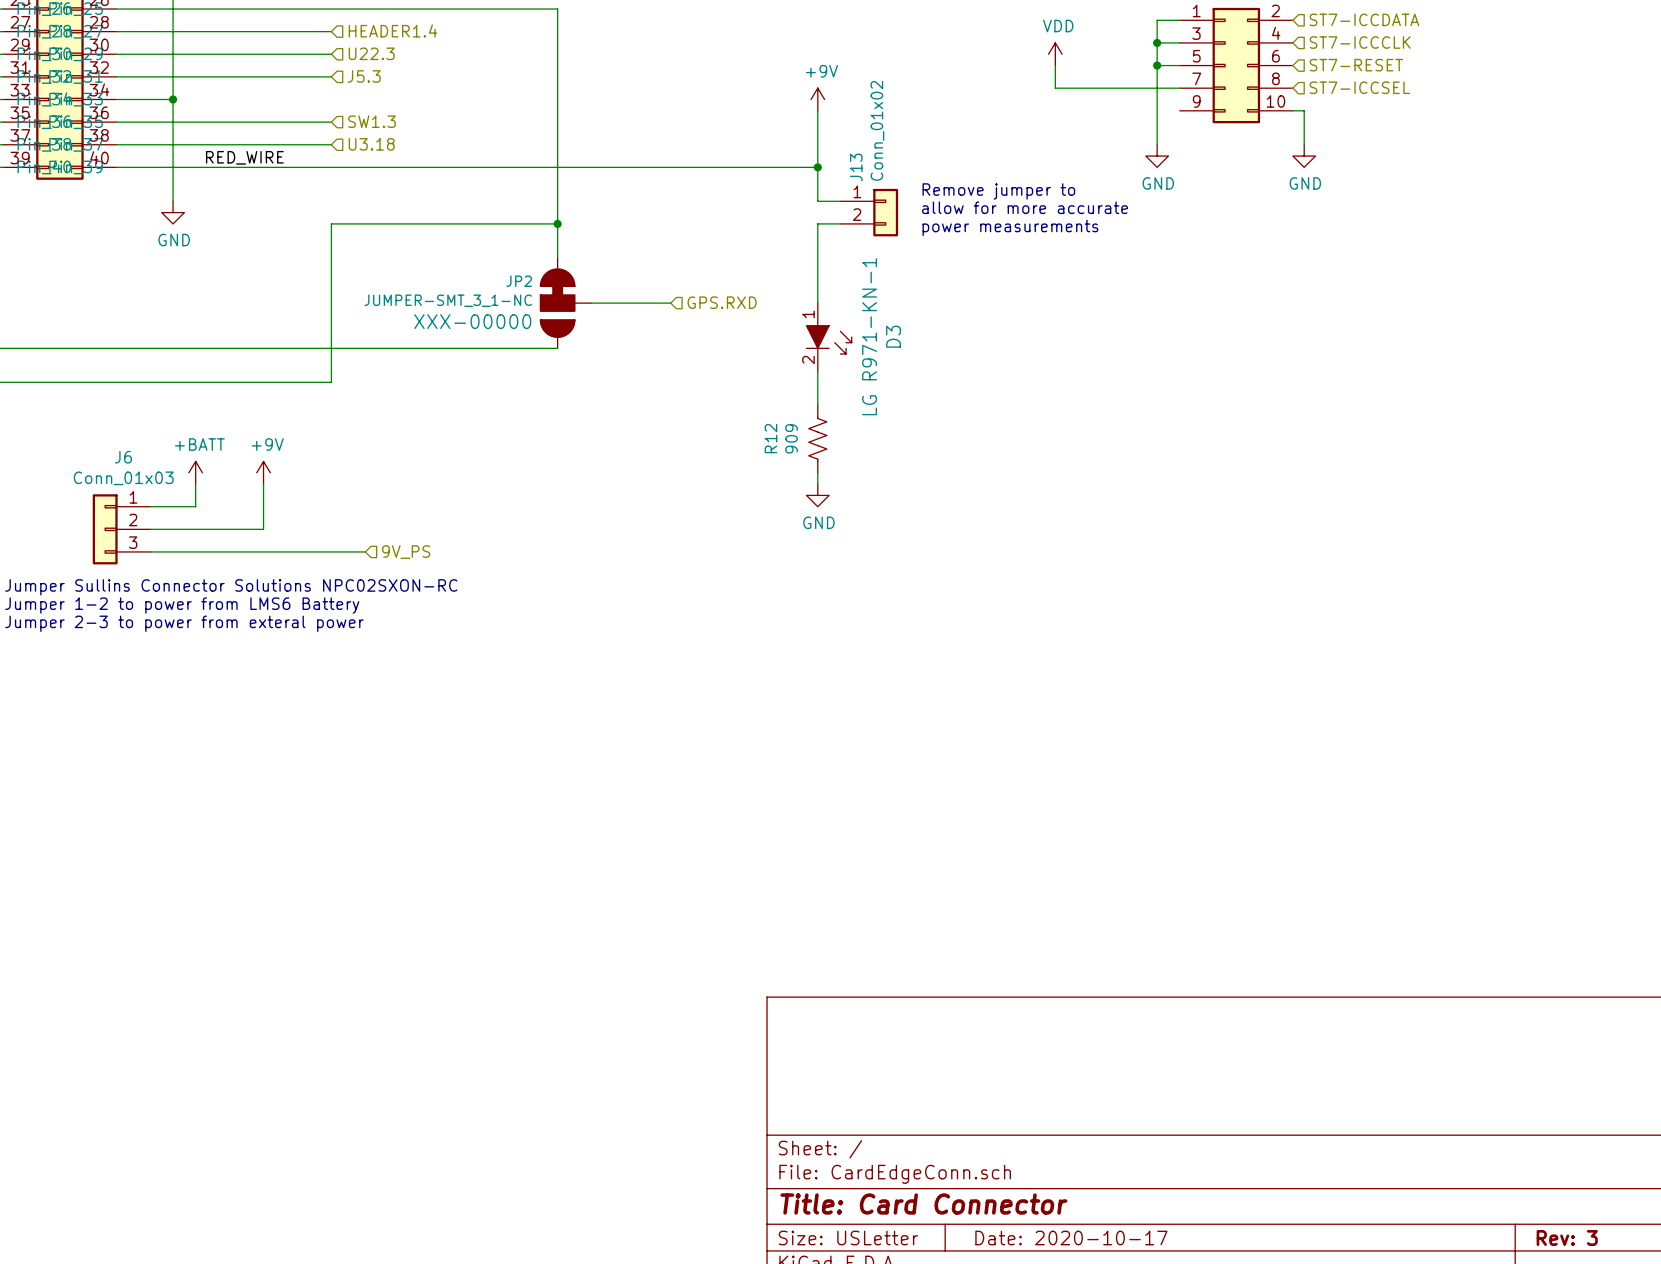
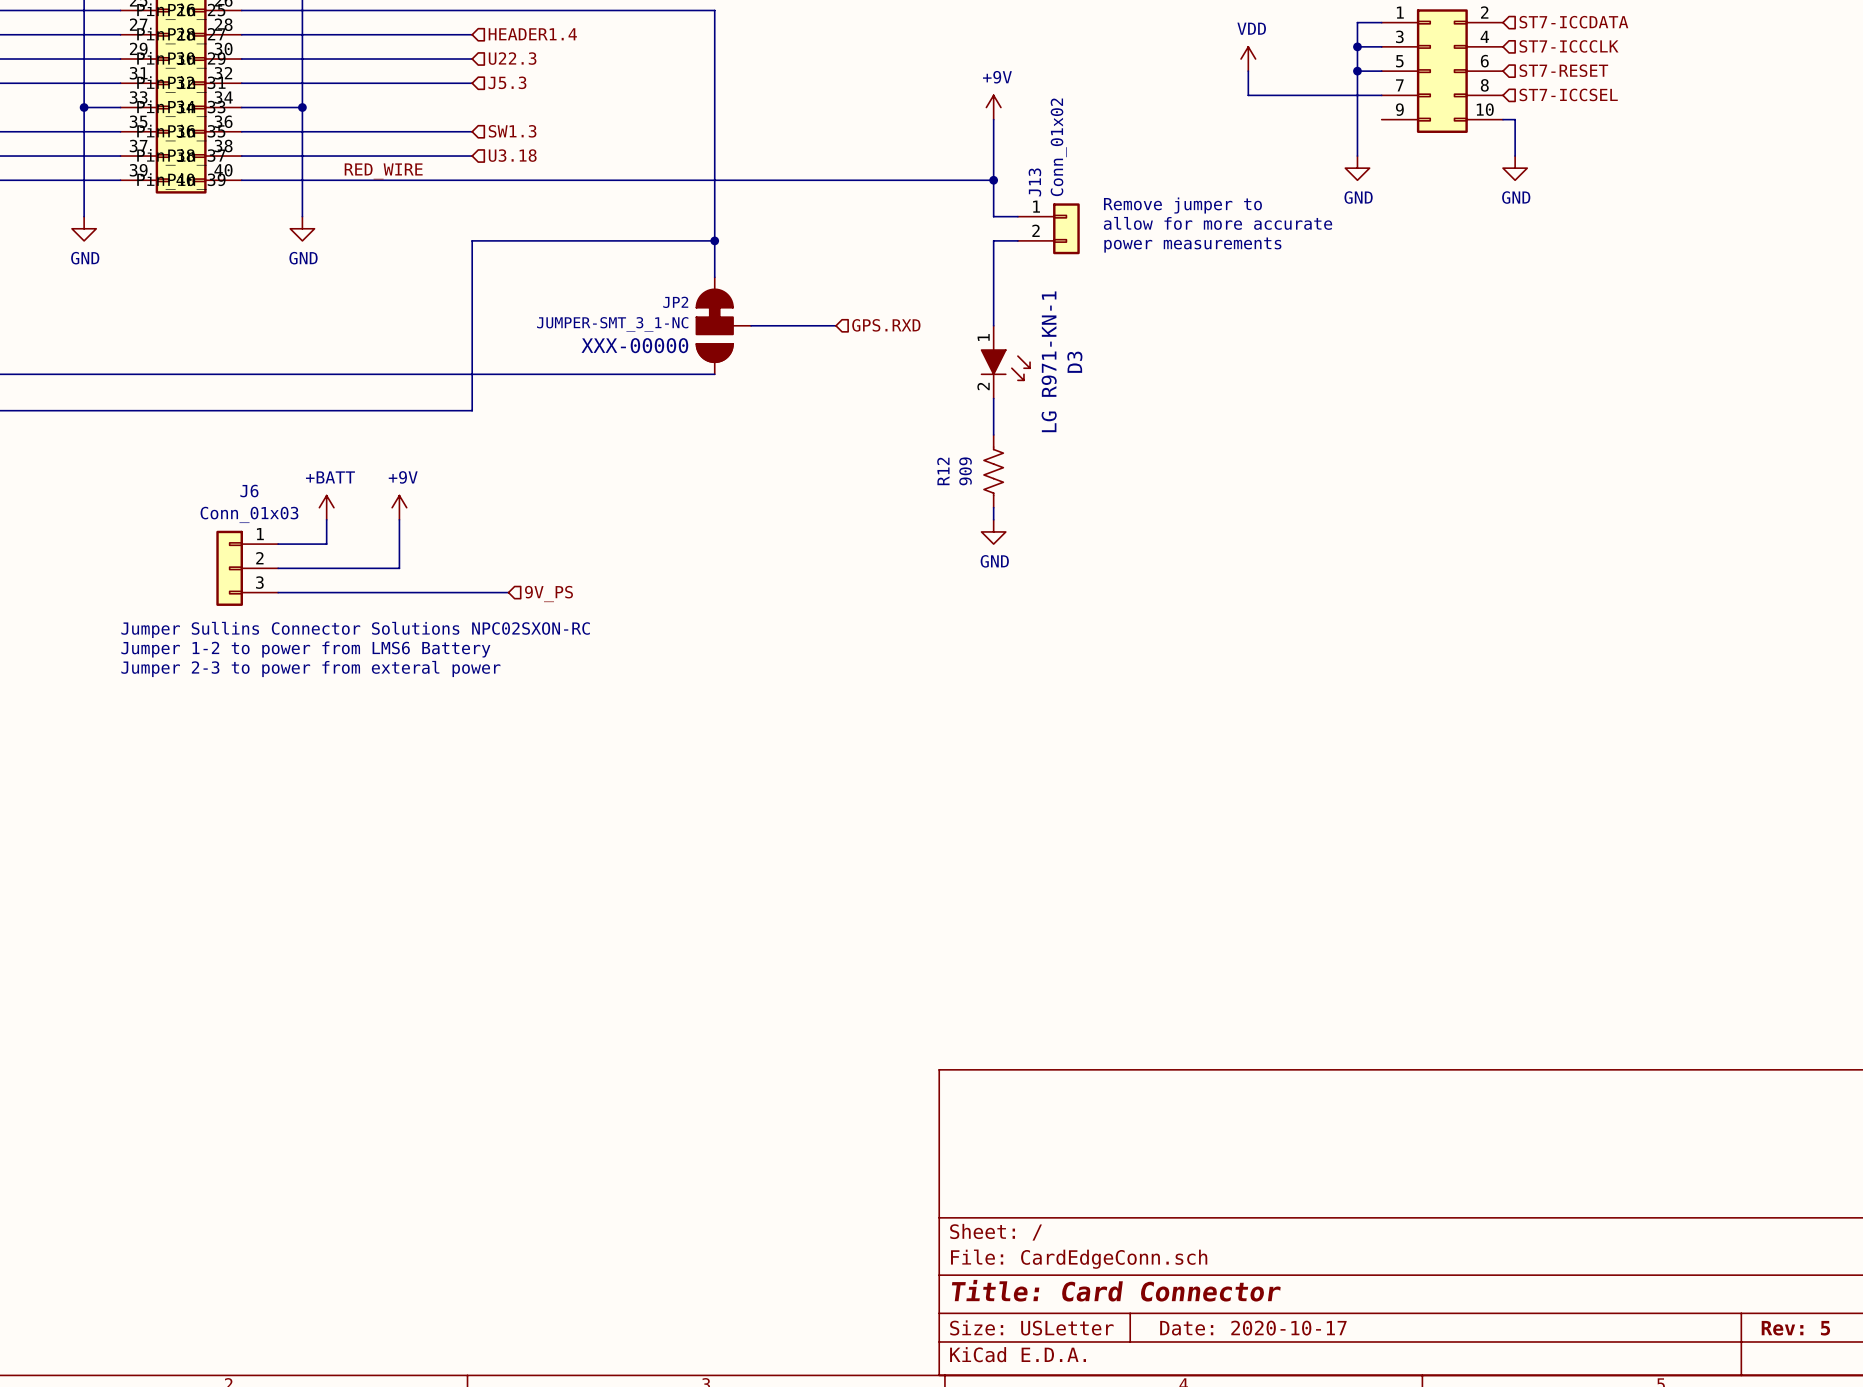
title block: Rev: 3 (1567, 1238) -> Rev: 5 (1795, 1328)

